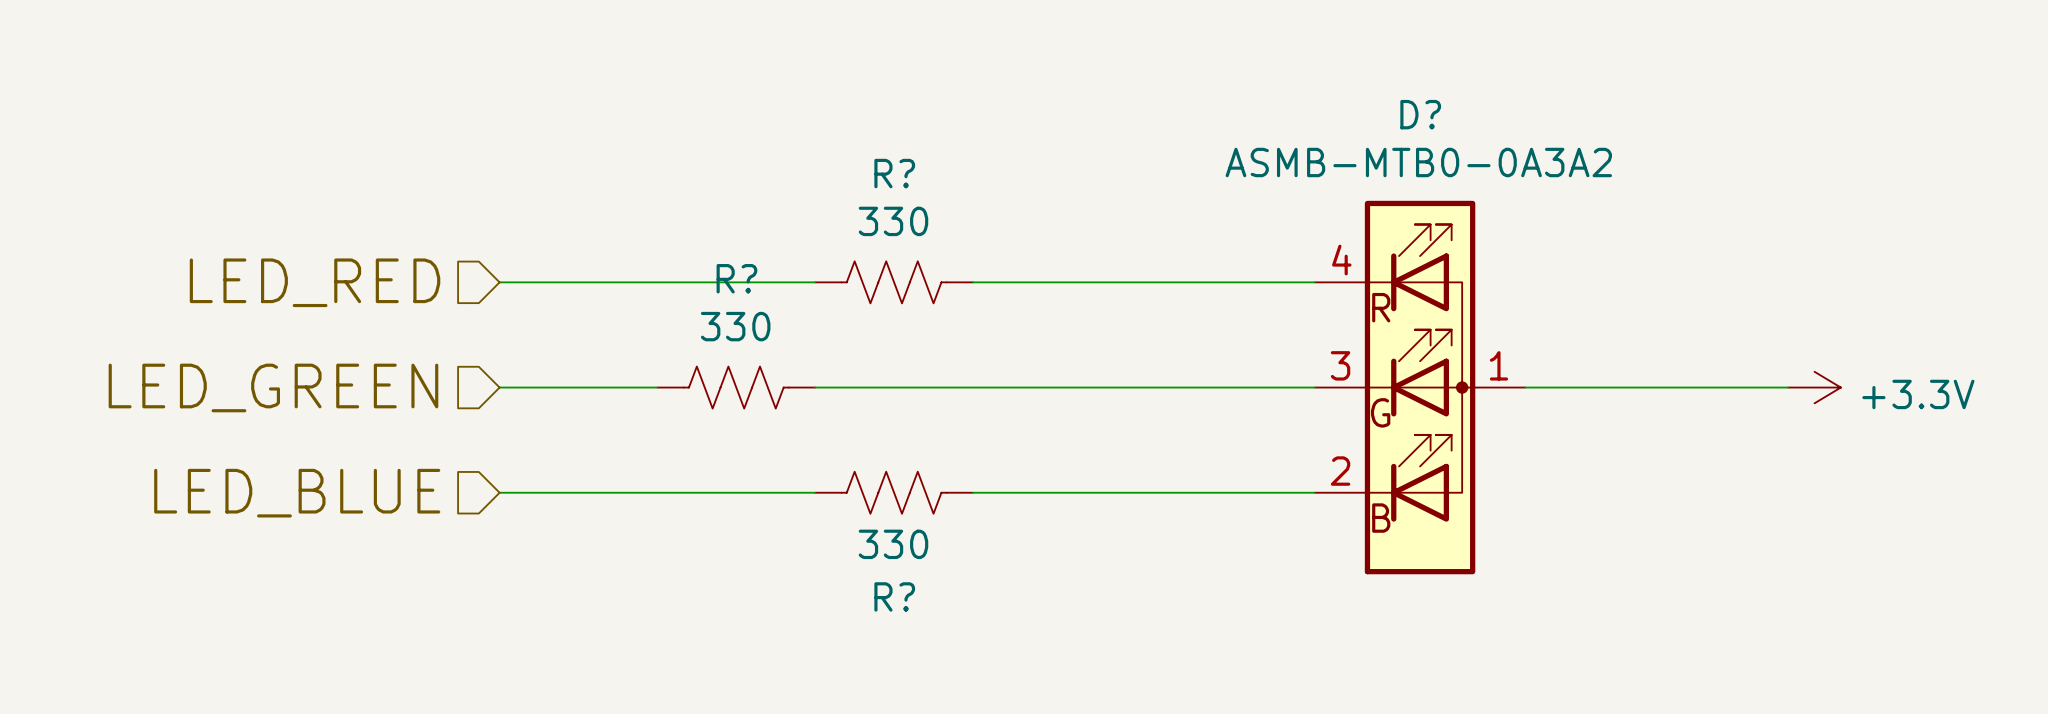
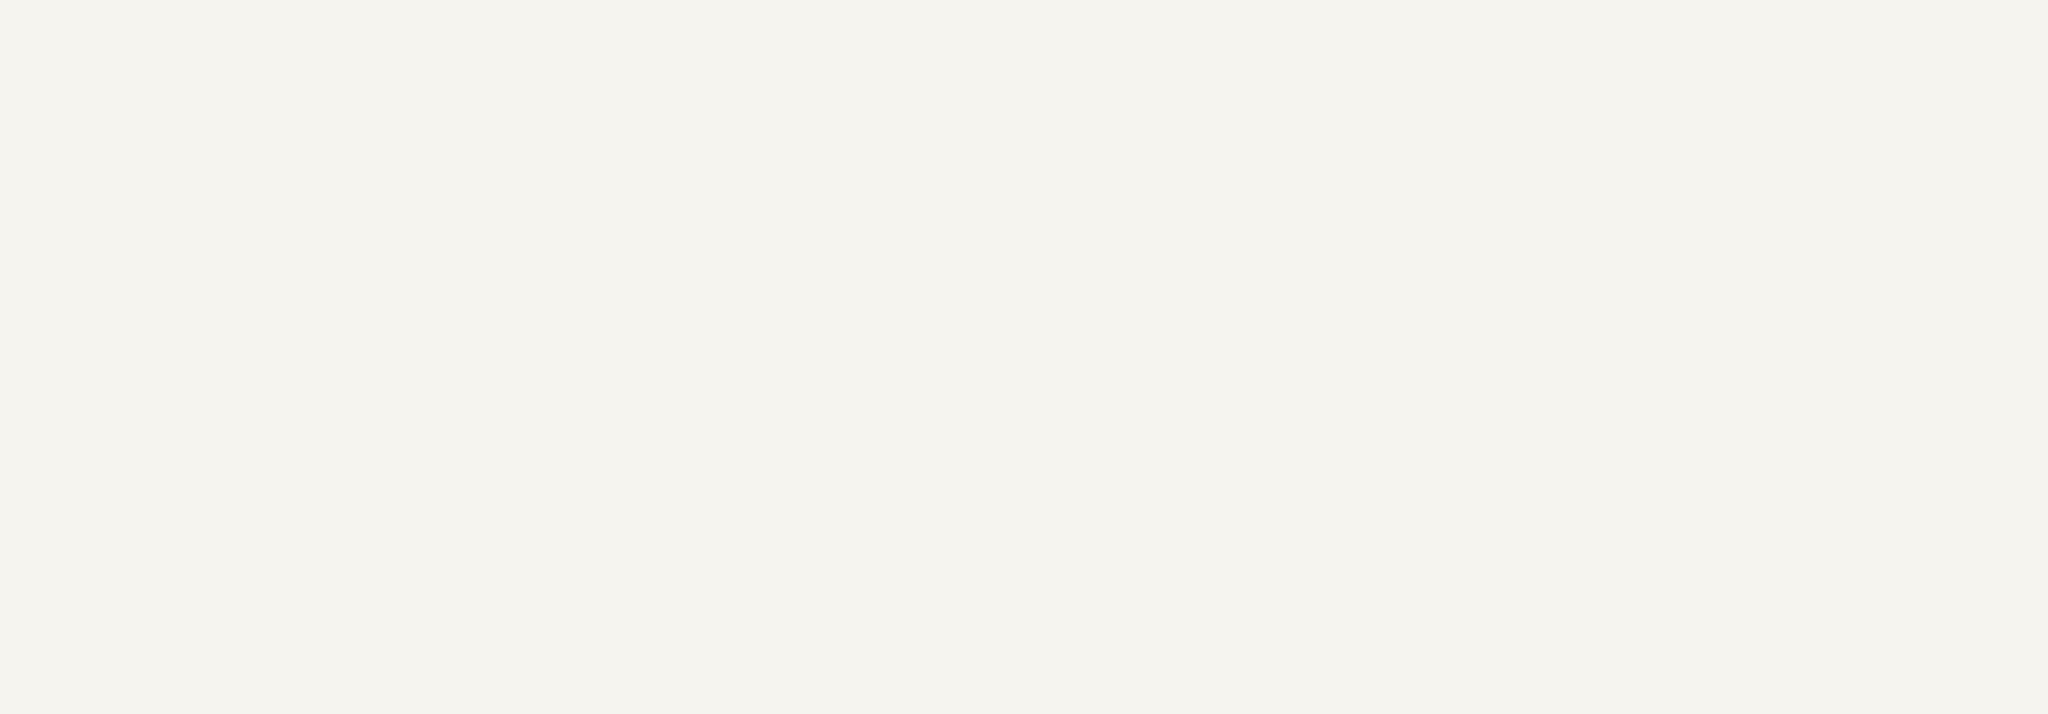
hierarchical label: LED_RED (315, 282) -> none
wire: (499, 282) (815, 282) -> none
R?: 330 (894, 282) -> none
wire: (972, 282) (1314, 282) -> none
hierarchical label: LED_GREEN (273, 387) -> none
wire: (499, 387) (657, 387) -> none
R?: 330 (736, 387) -> none
wire: (815, 387) (1314, 387) -> none
D?: ASMB-MTB0-0A3A2 (1420, 387) -> none
wire: (1525, 387) (1788, 387) -> none
power symbol: +3.3V (1814, 387) -> none
wire: (499, 492) (815, 492) -> none
R?: 330 (894, 492) -> none
wire: (972, 492) (1314, 492) -> none
hierarchical label: LED_BLUE (297, 493) -> none

